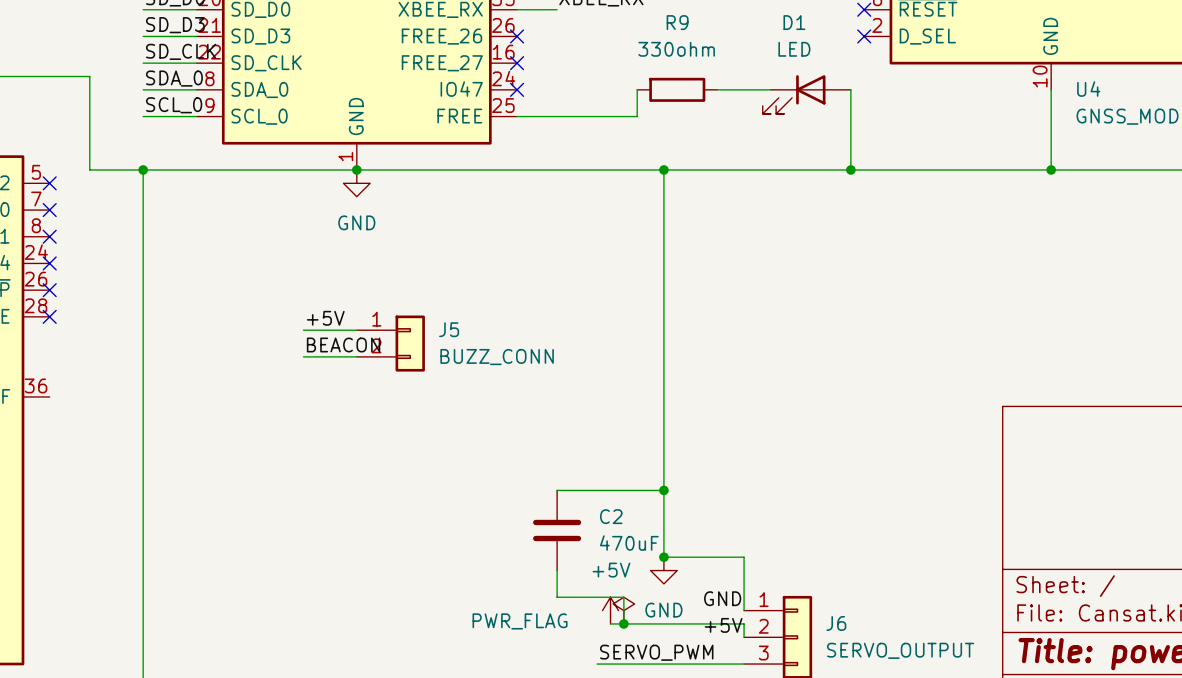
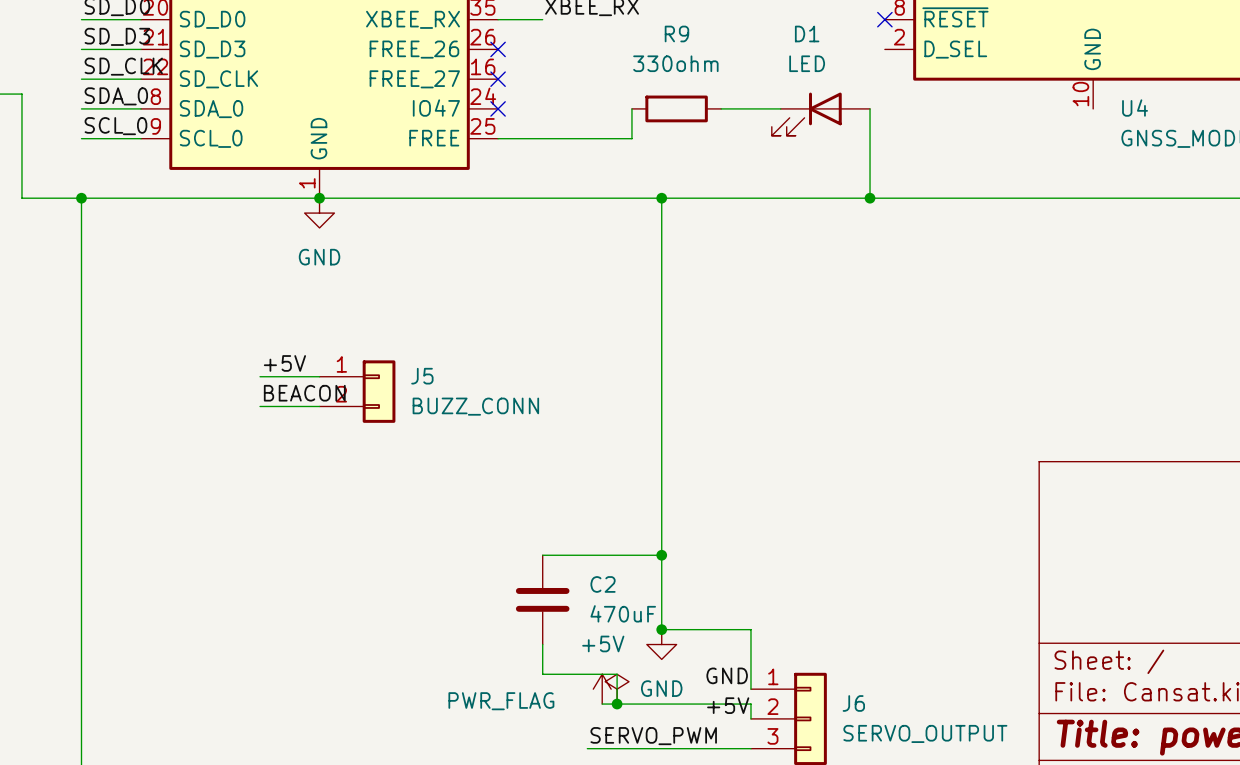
no-connect mark: (864, 36) -> none
wire: (1051, 89) (1051, 169) -> none
junction: (1051, 169) -> none

